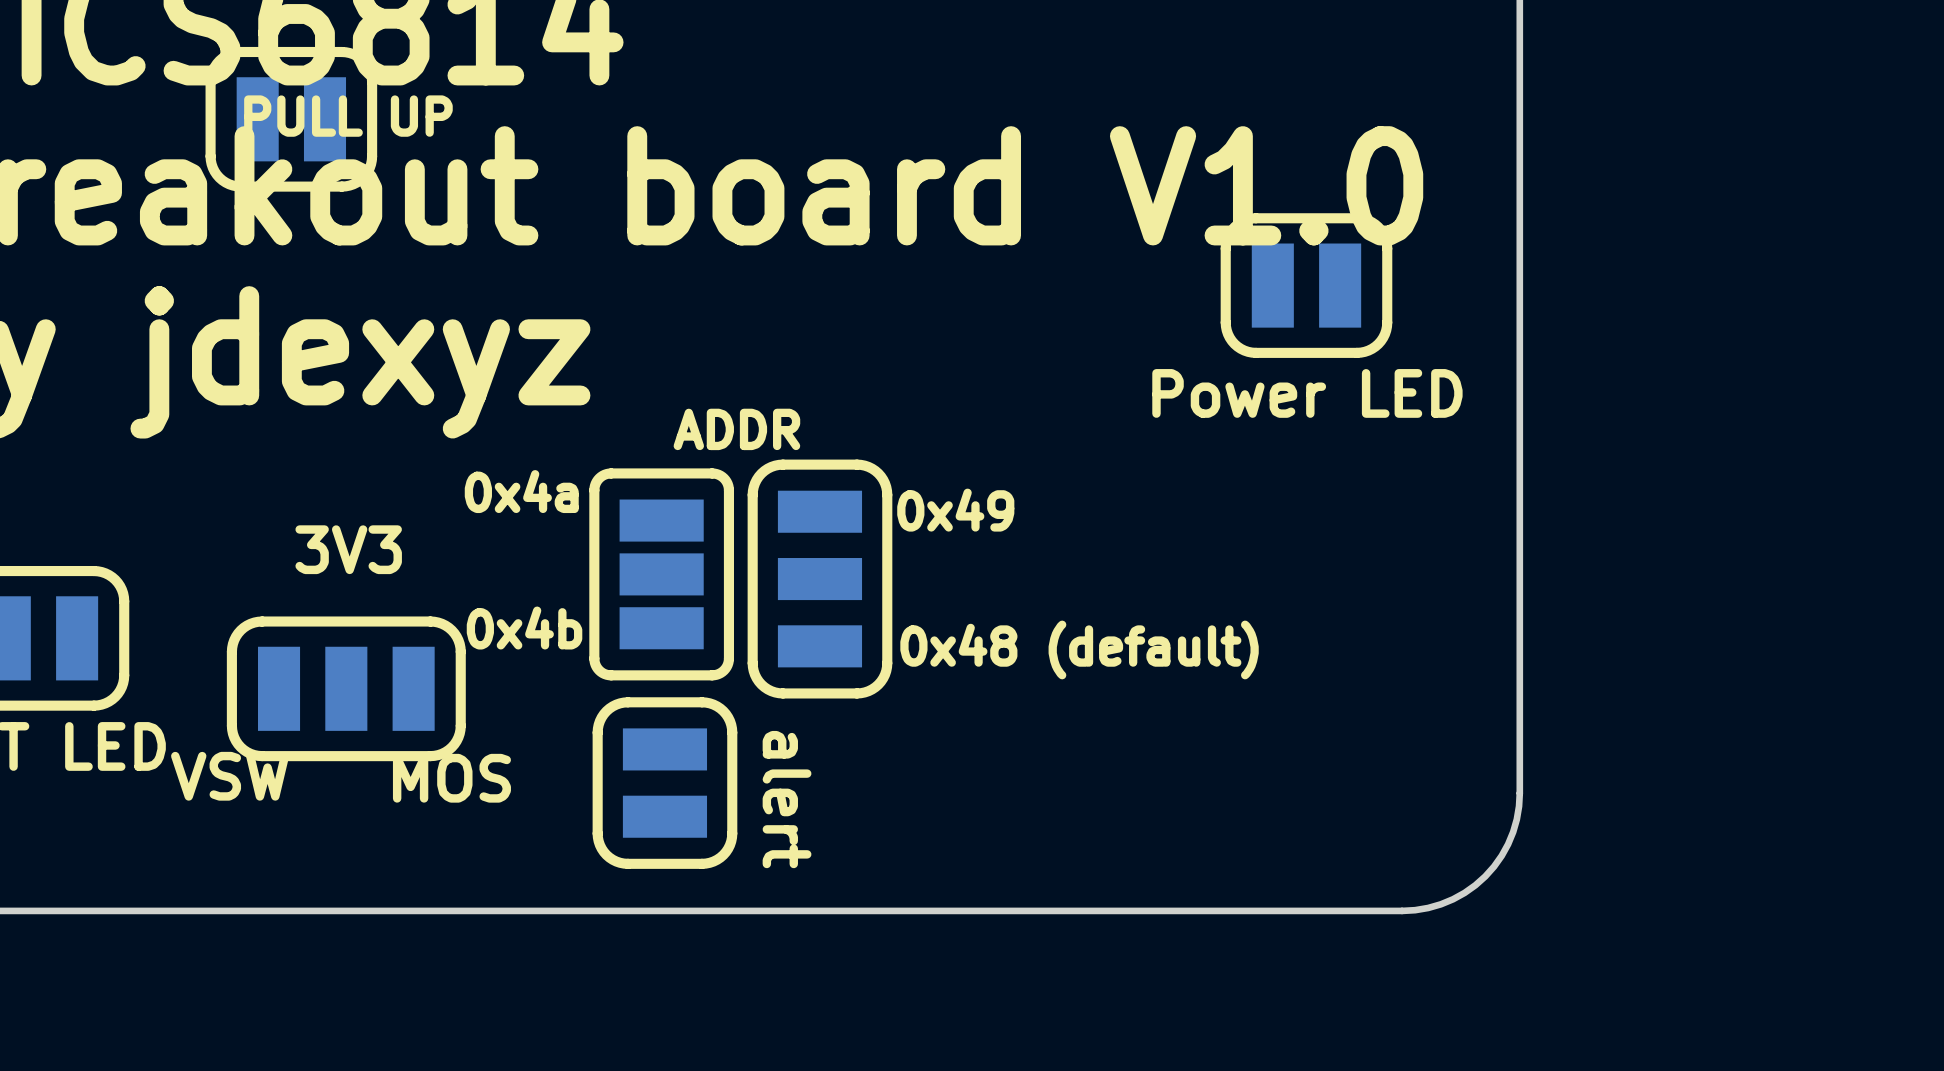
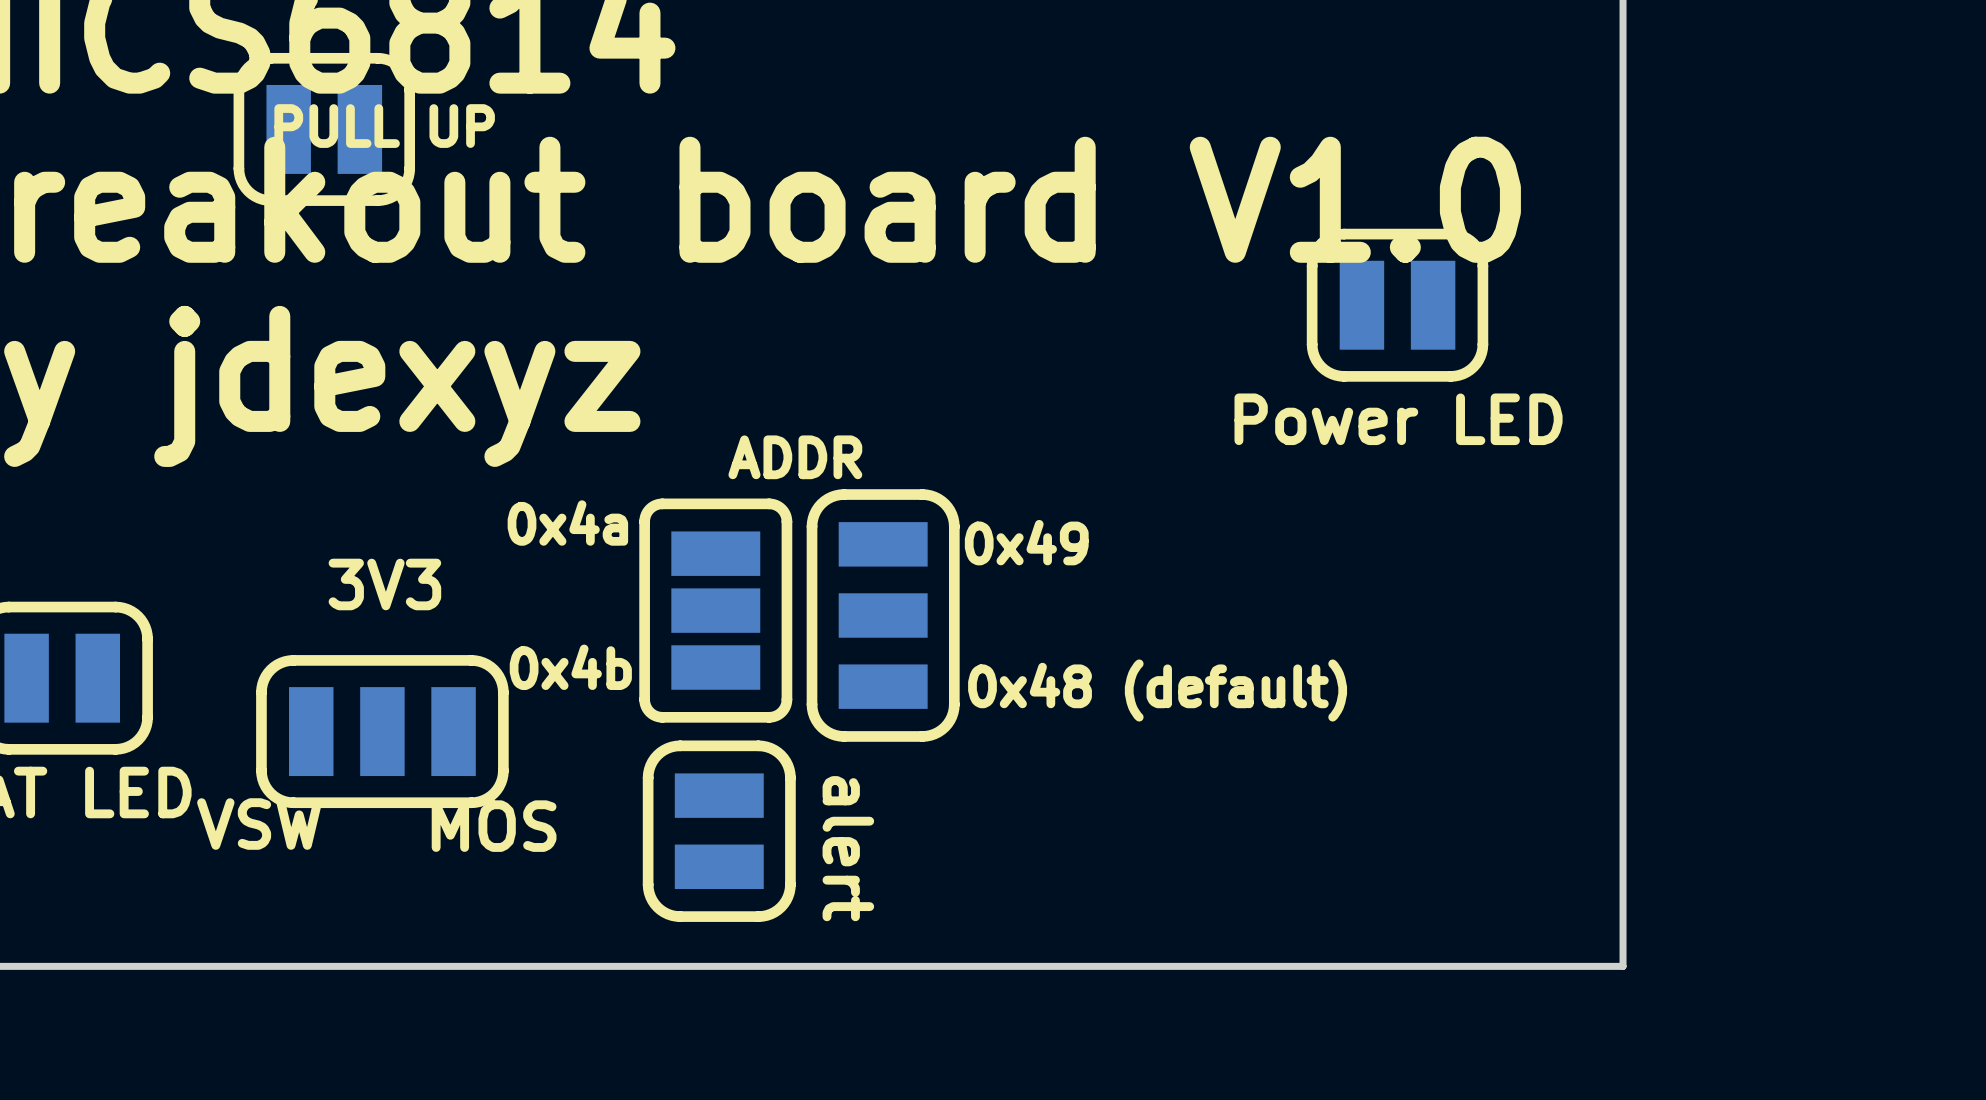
board edge: (1519, 793) (1513, 832) (1501, 855) (1485, 876) (1464, 892) (1440, 904) (1402, 910) -> (1623, 841) (1623, 966) (1498, 966)

